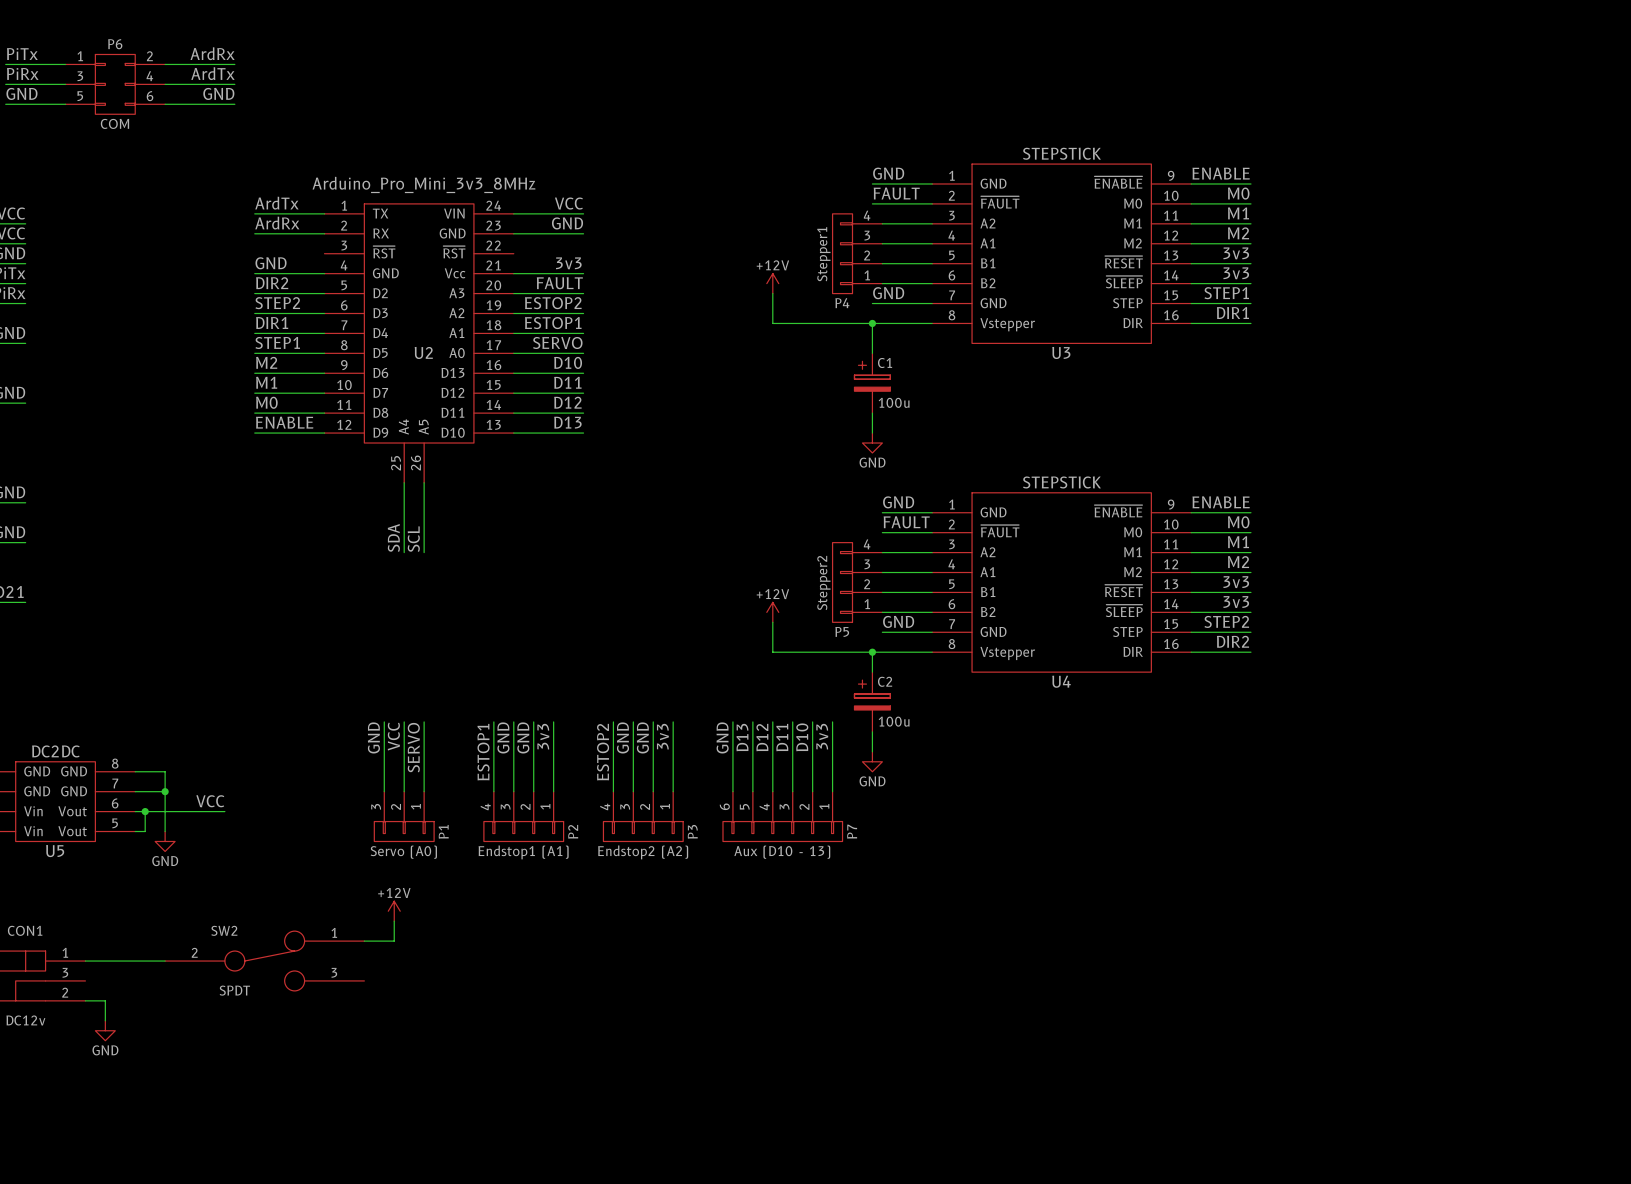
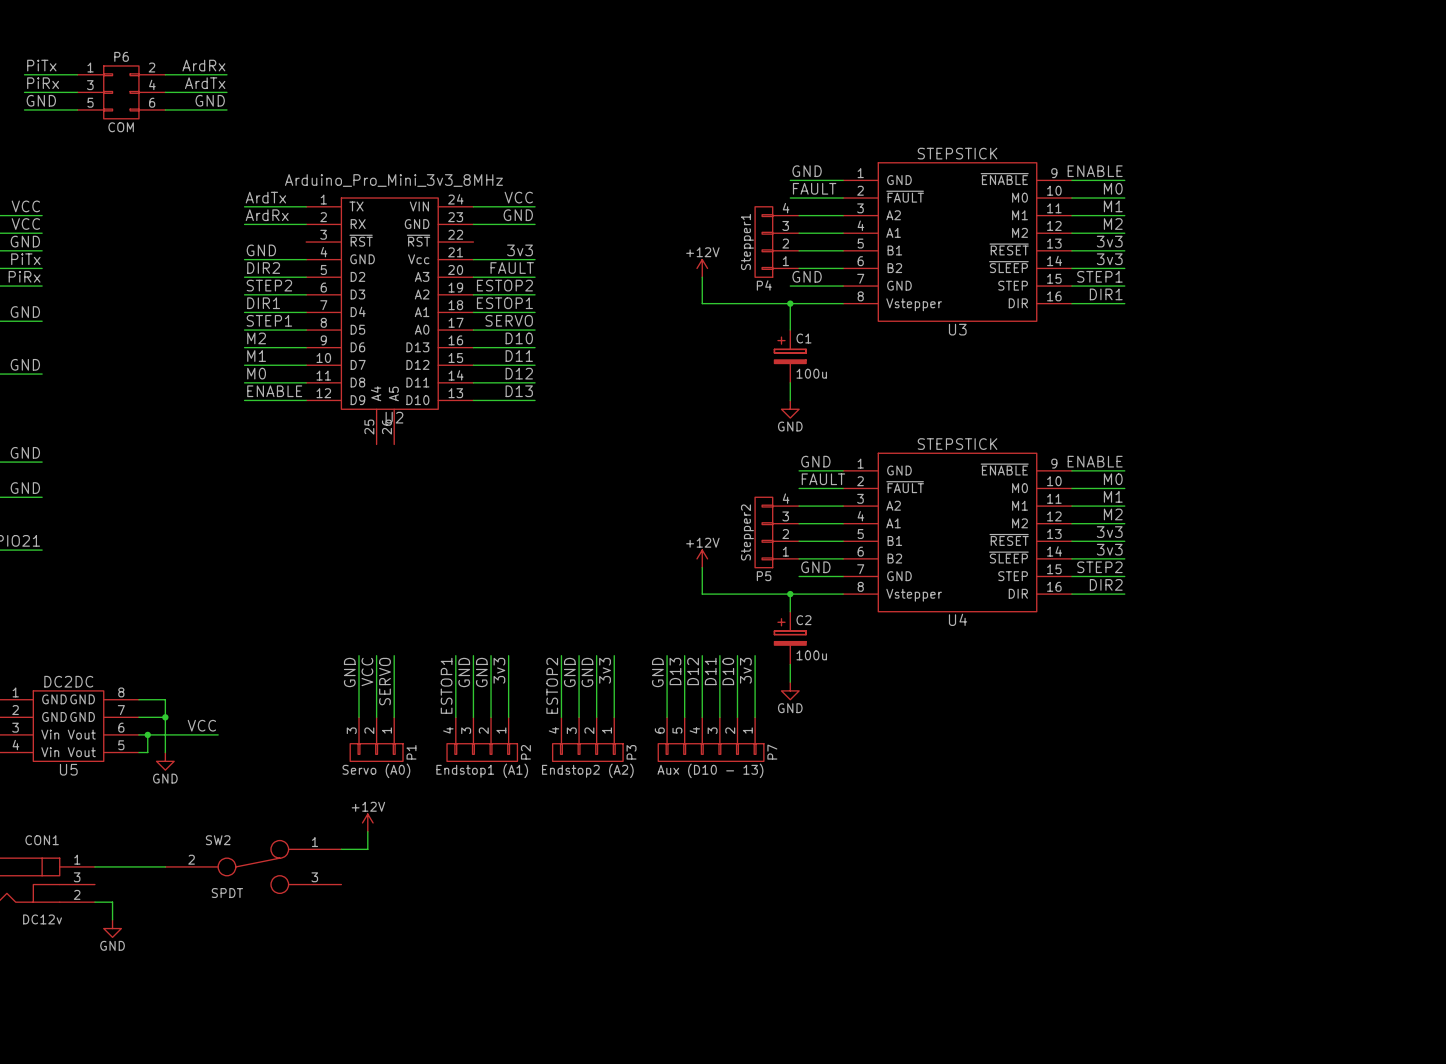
U2 name position: U2 (423, 352) -> U2 (394, 417)
wire: (404, 482) (404, 552) -> none
wire: (424, 482) (424, 552) -> none
label: SDA (393, 537) -> none
label: SCL (413, 539) -> none

